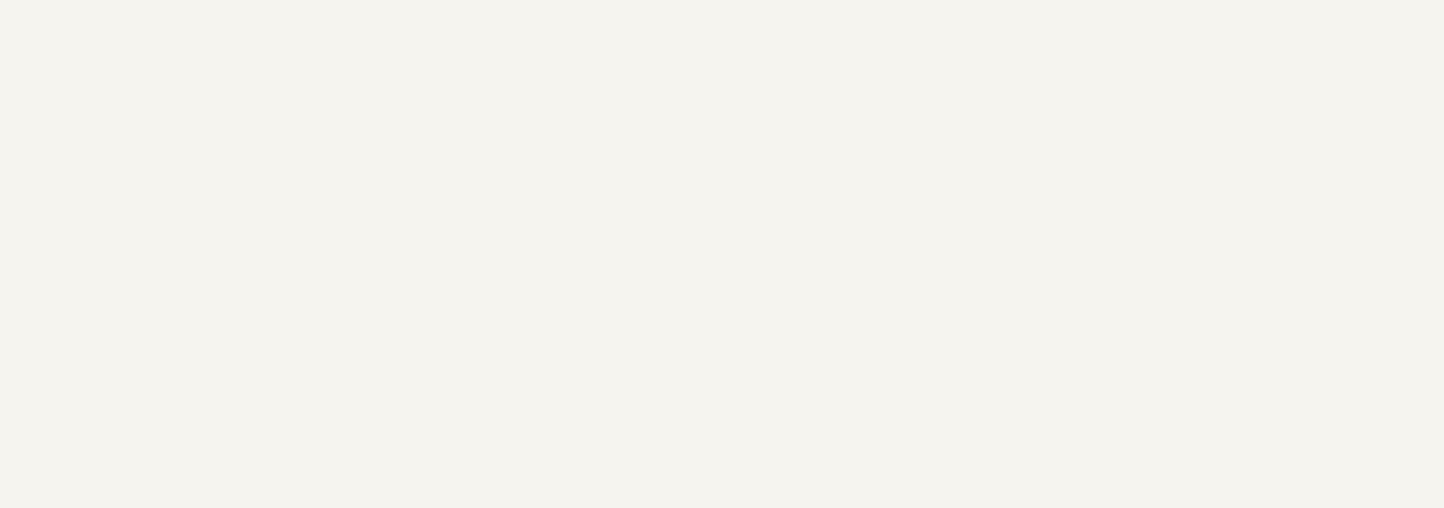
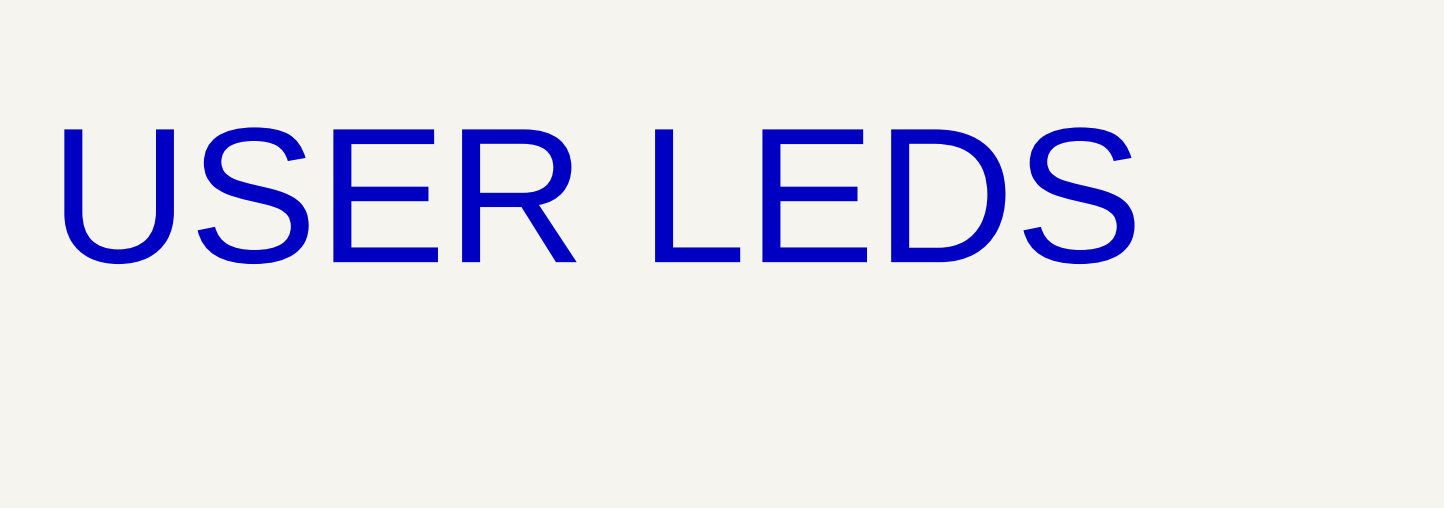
text: none -> USER LEDS (599, 195)

